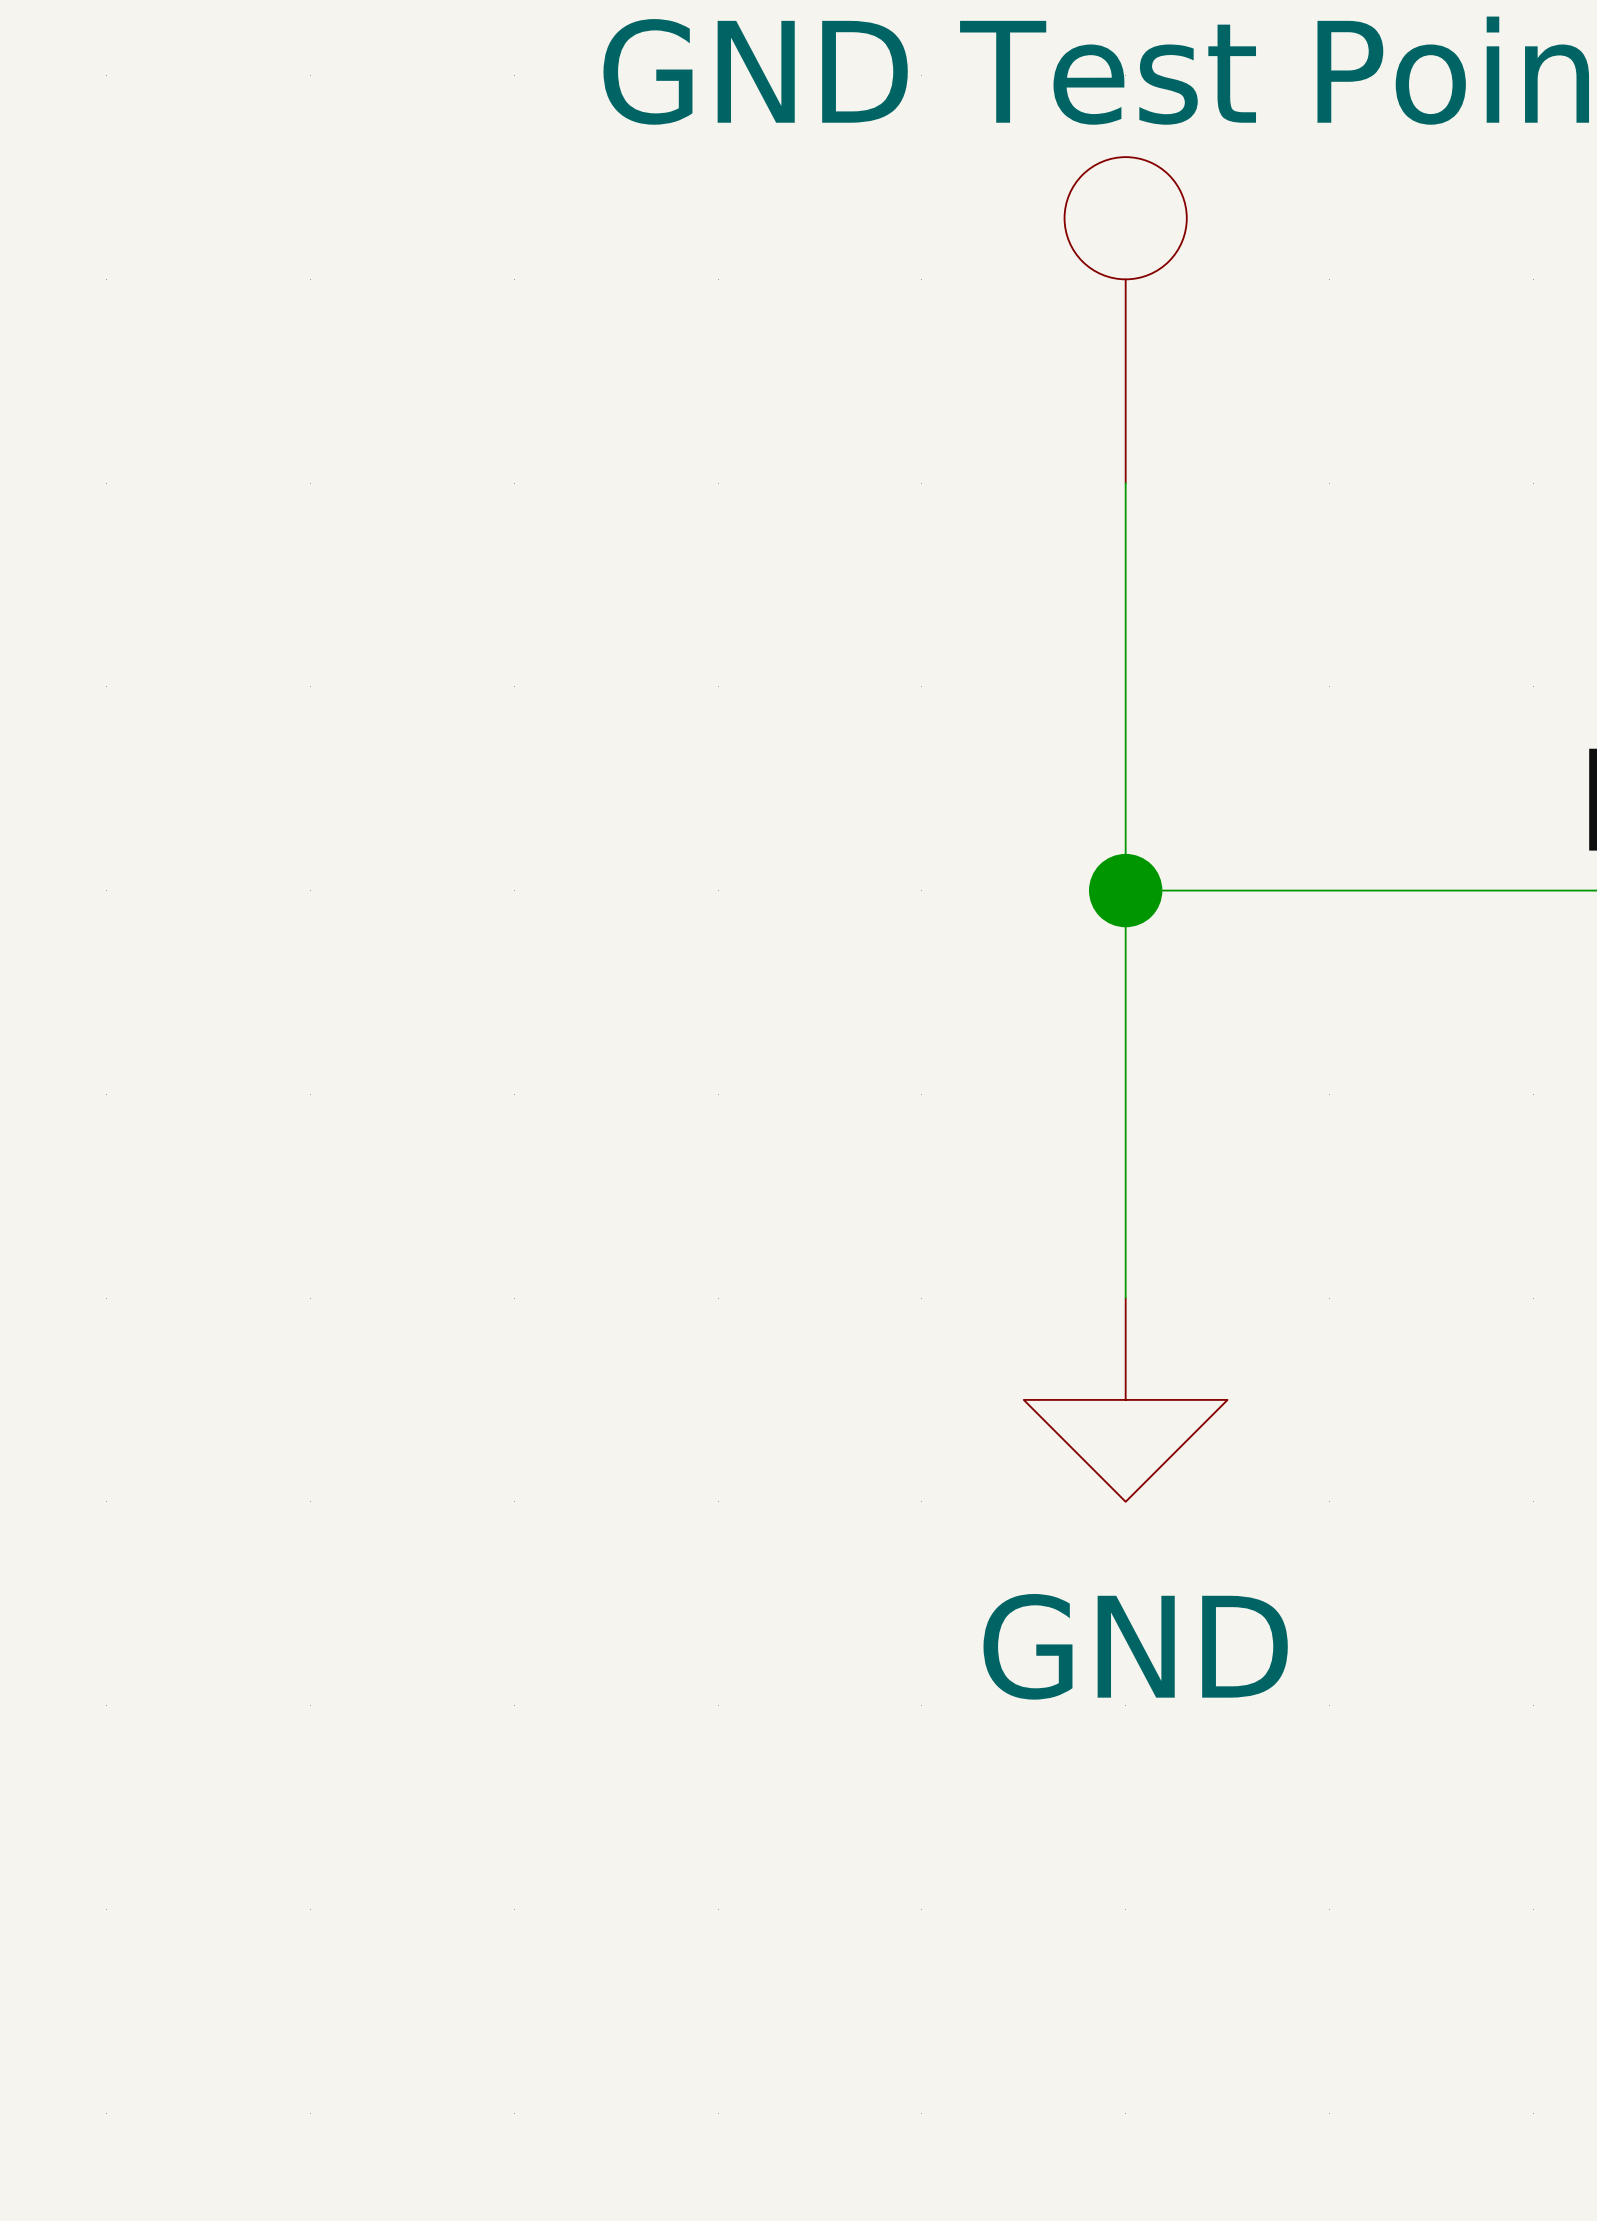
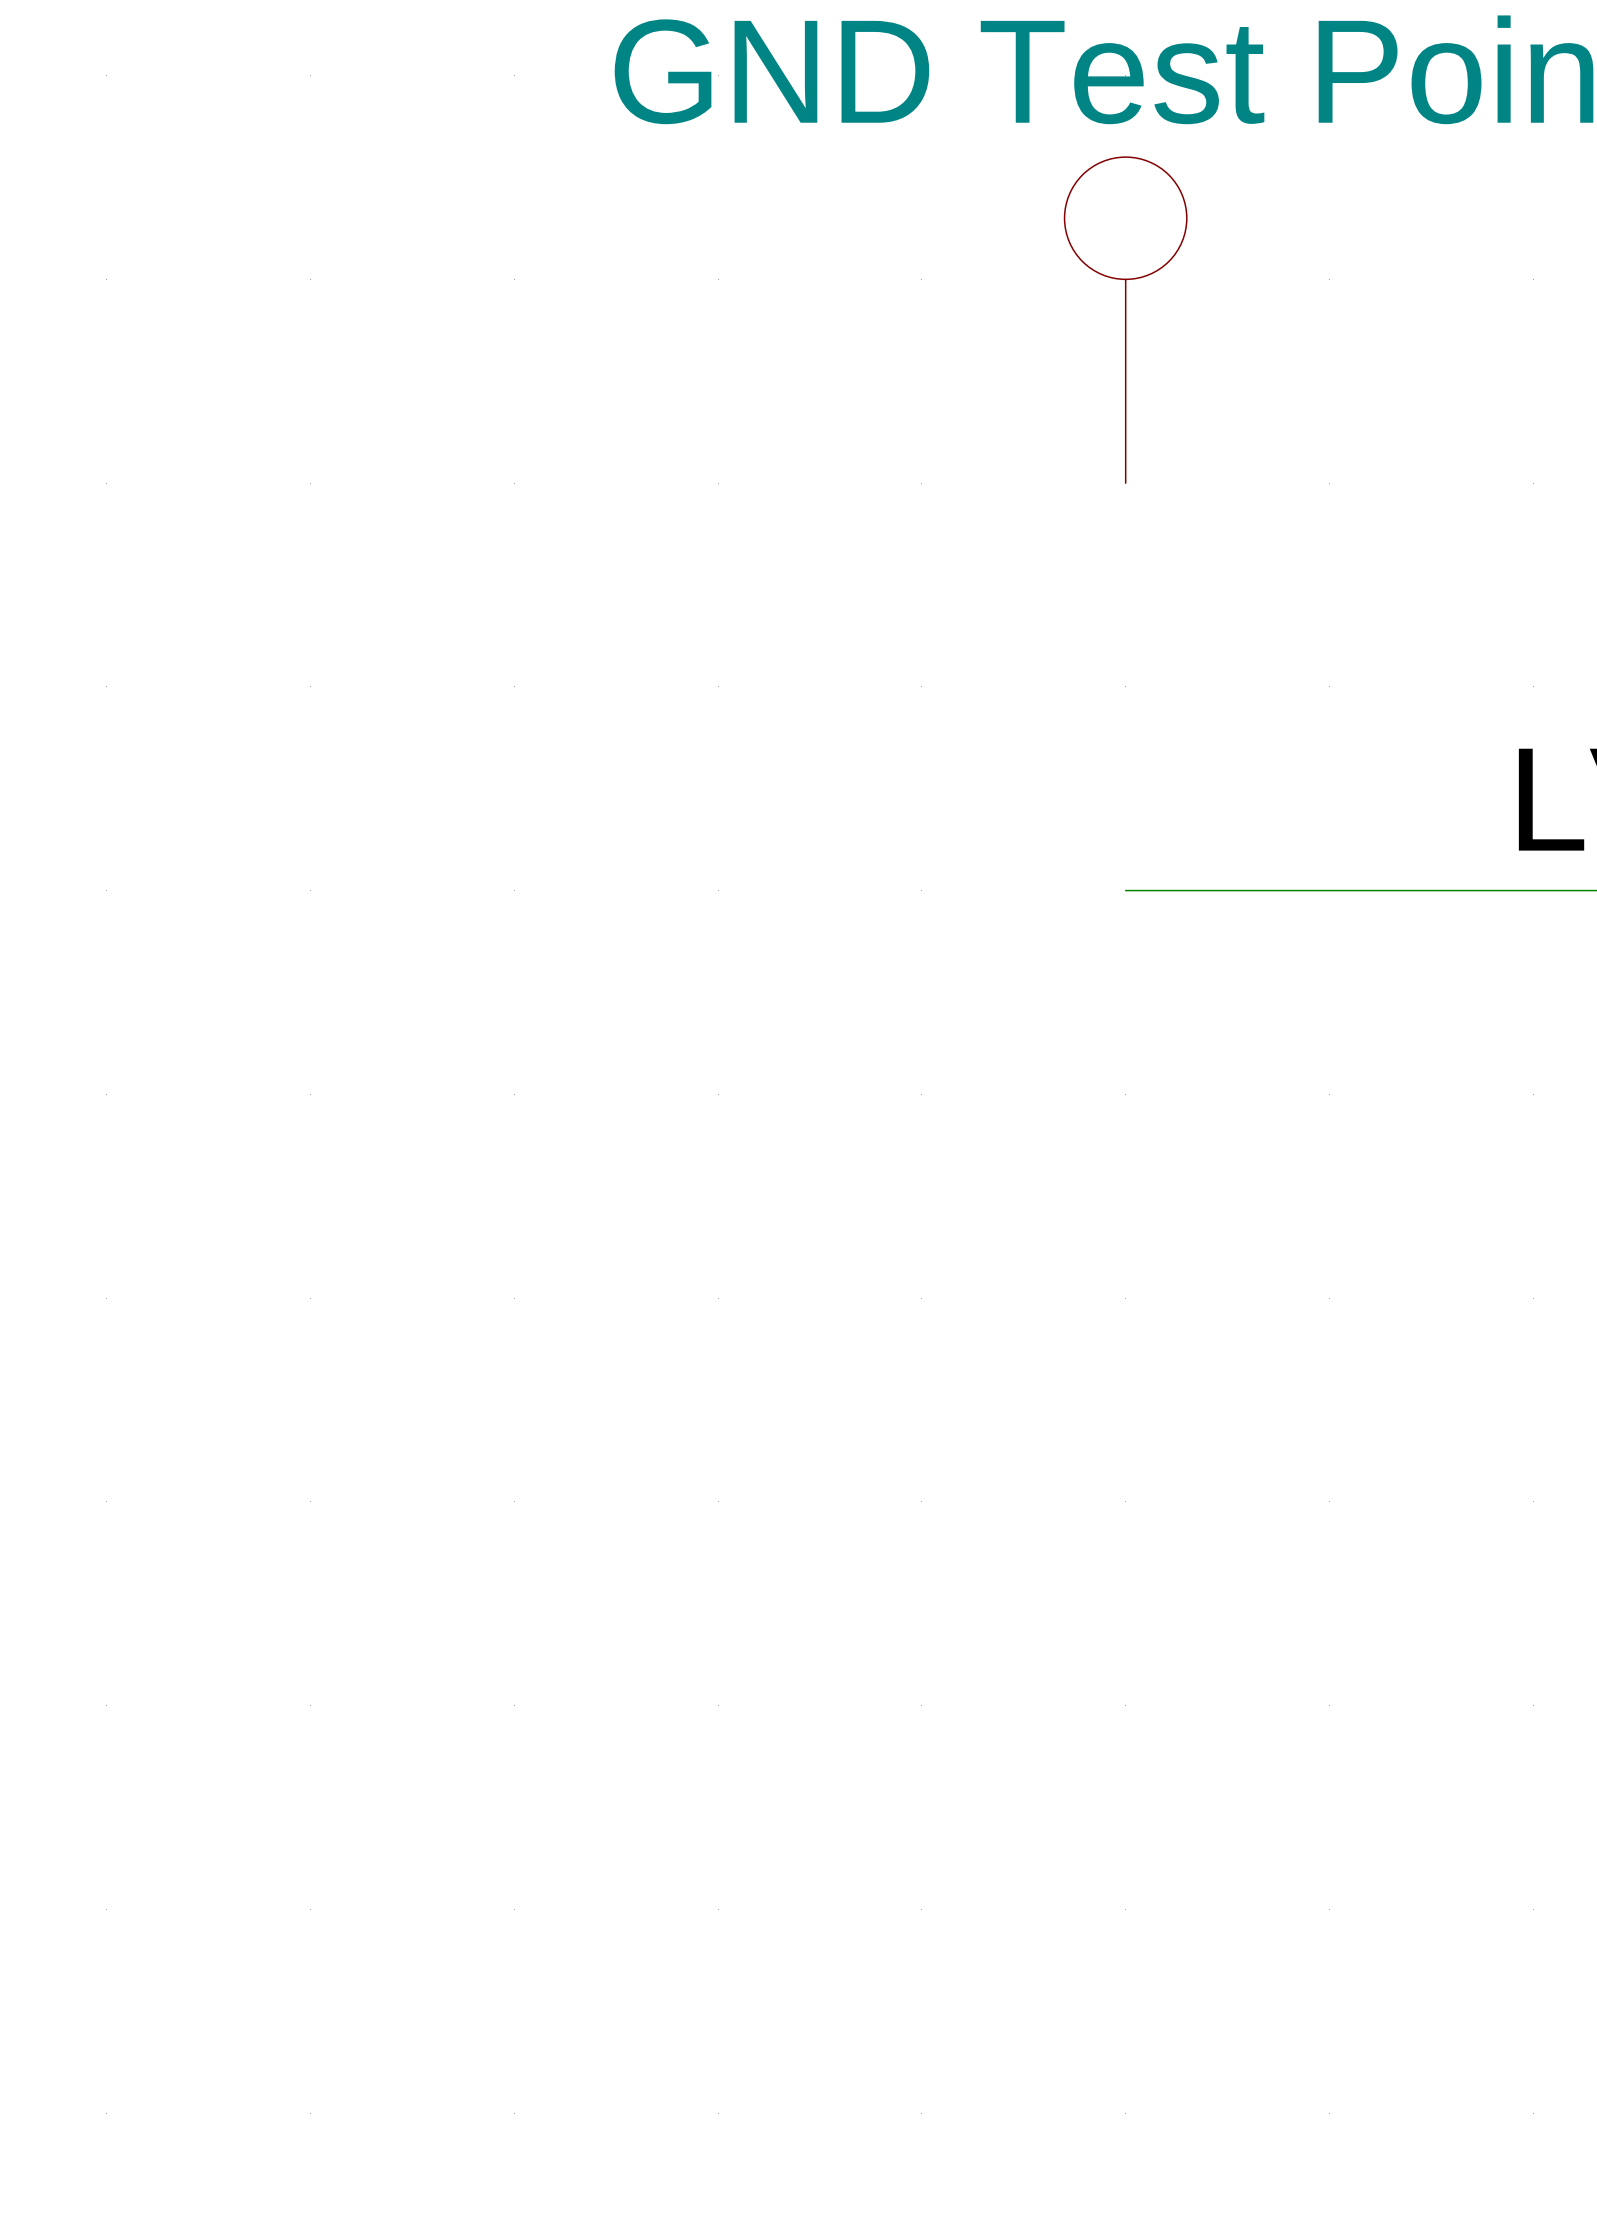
wire: (1125, 483) (1125, 1298) -> none
junction: (1125, 890) -> none
power symbol: GND (1125, 1399) -> none

